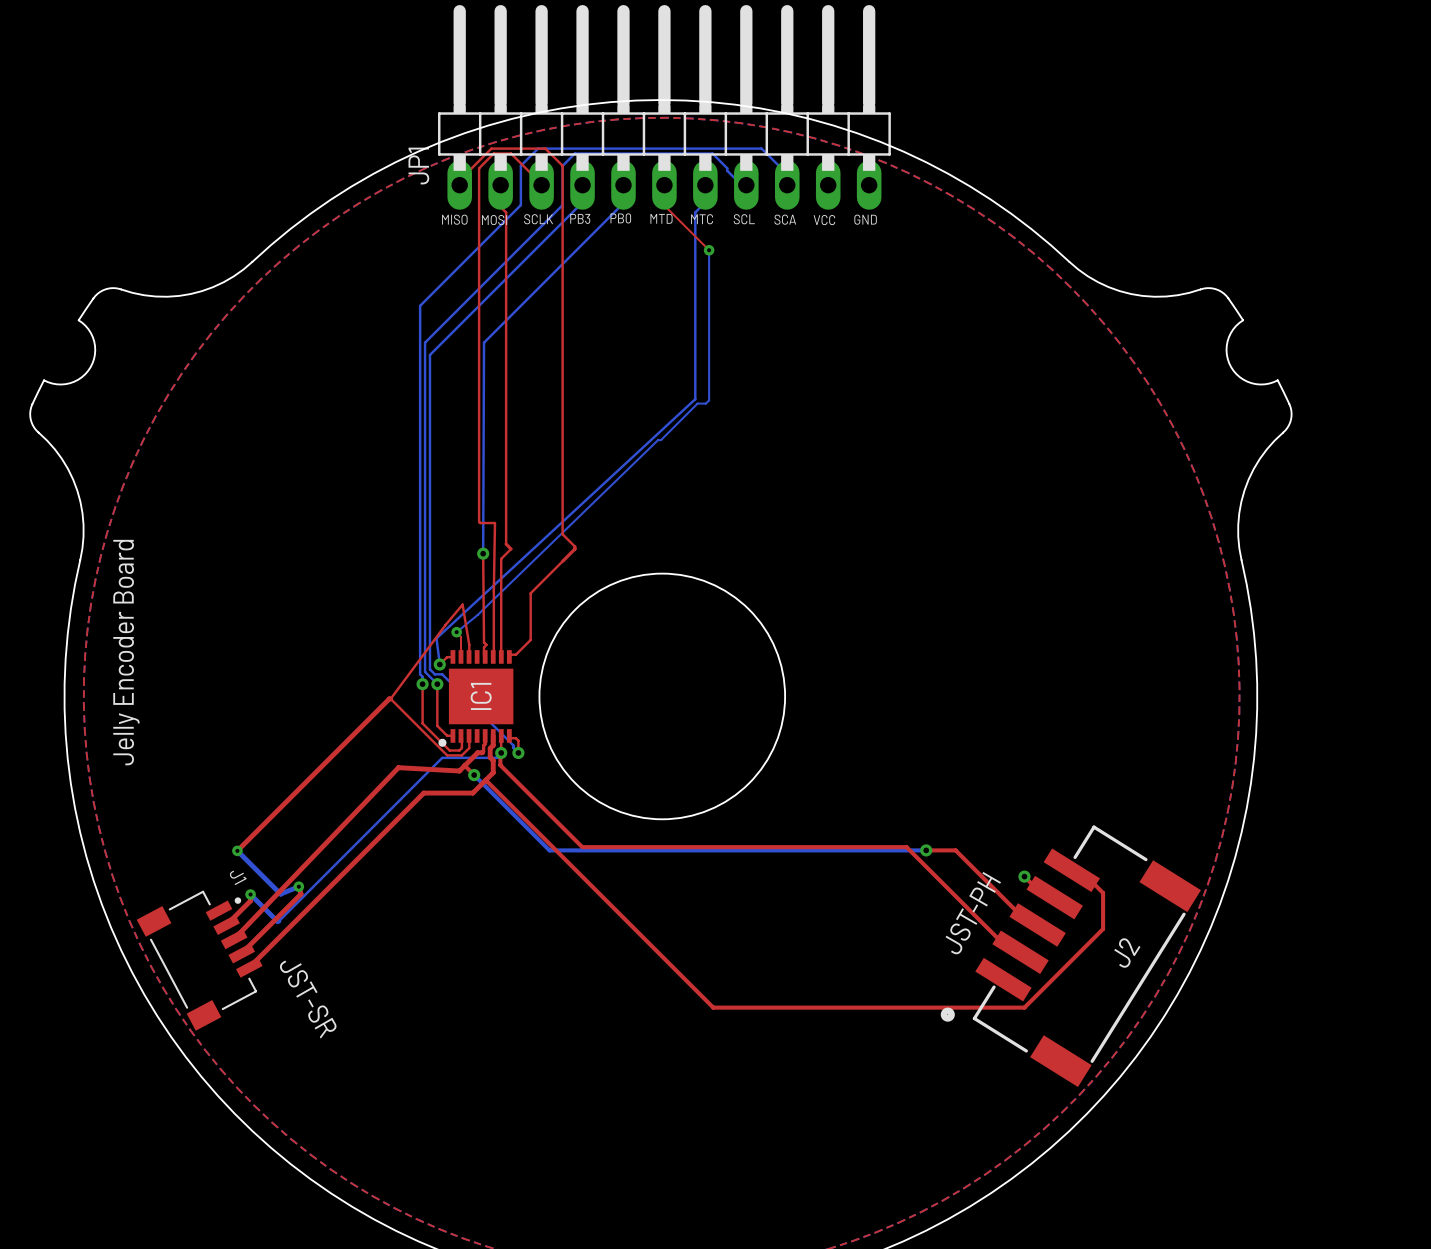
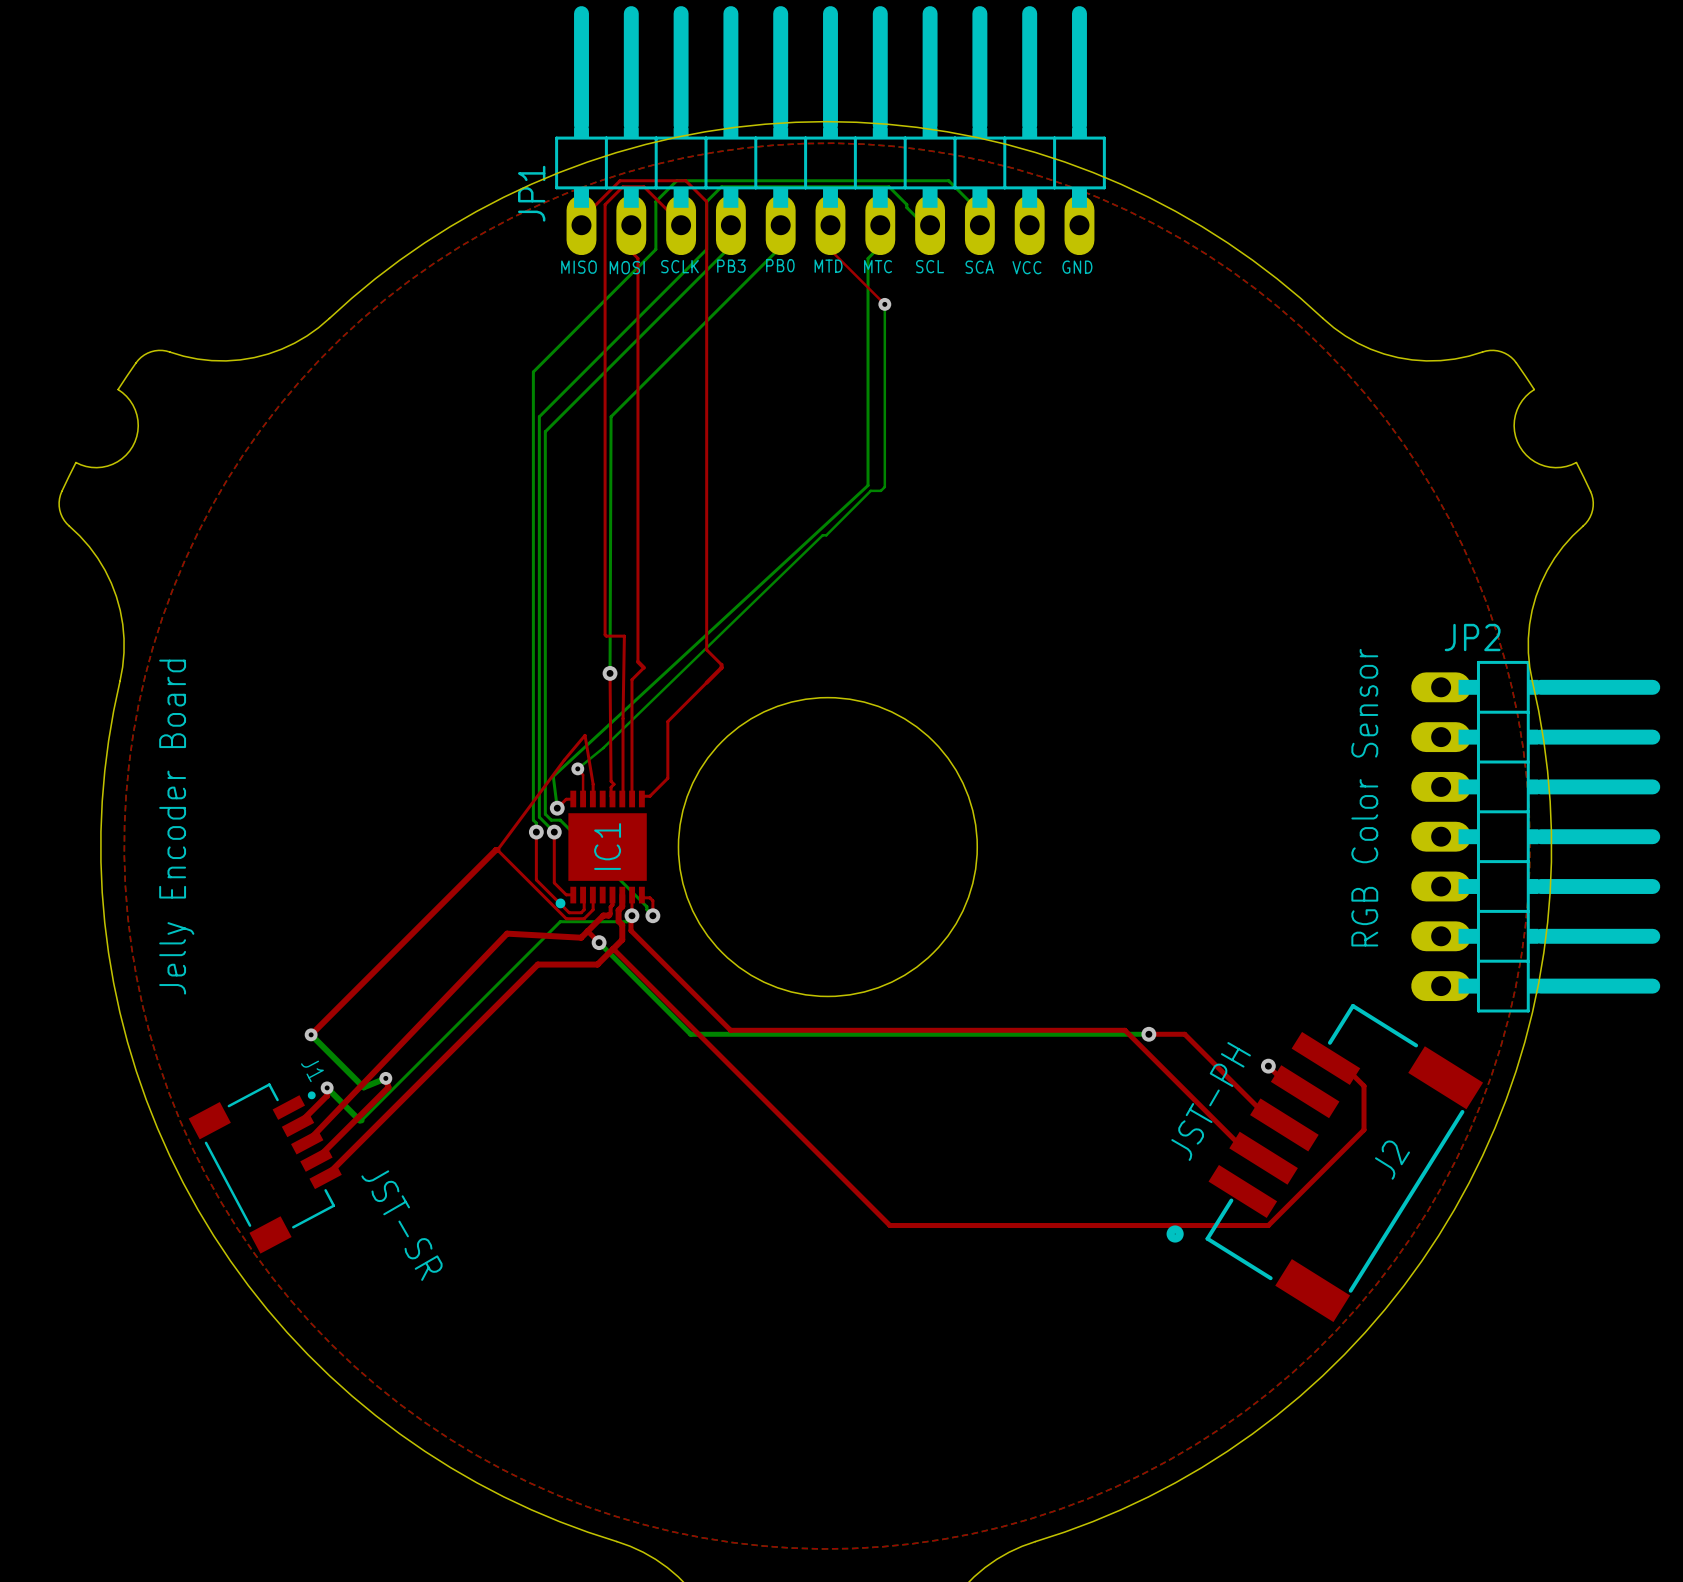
text: none -> RGB Color Sensor (1364, 797)
JP2: none -> (1535, 836)

